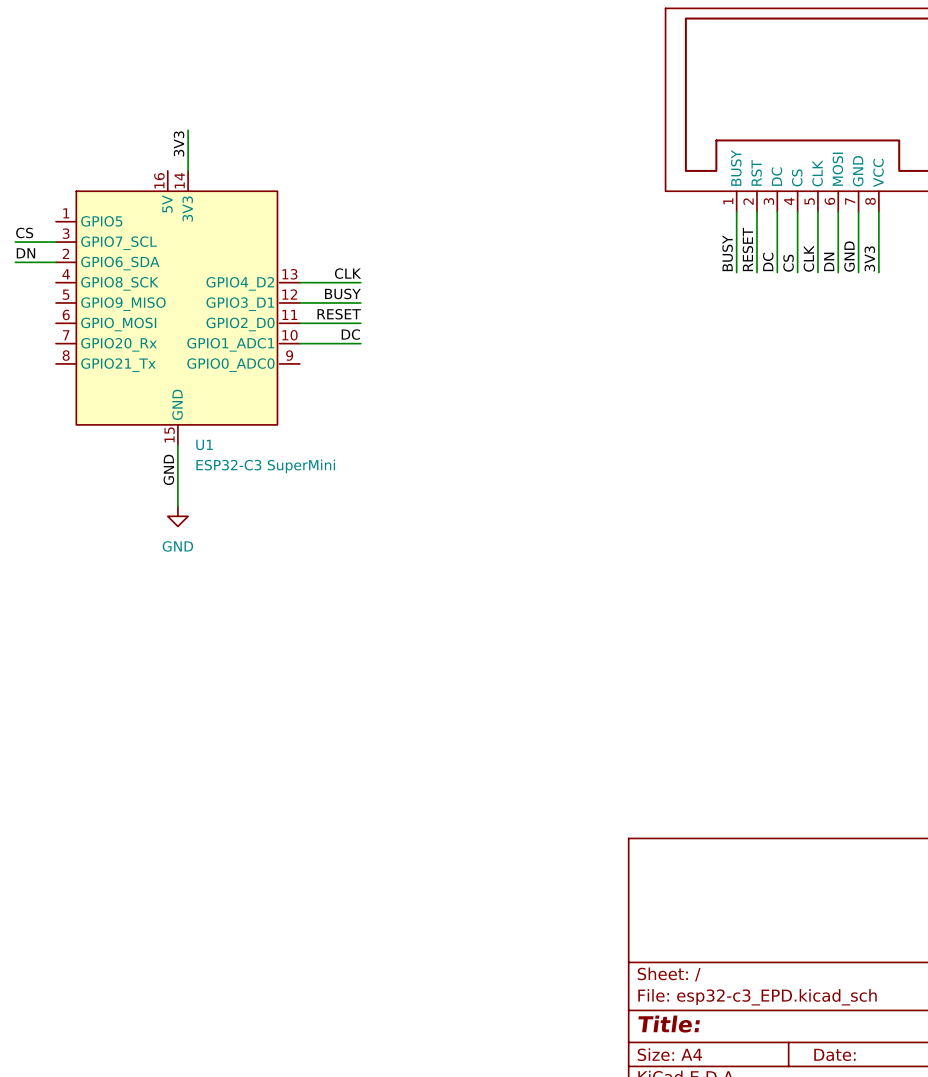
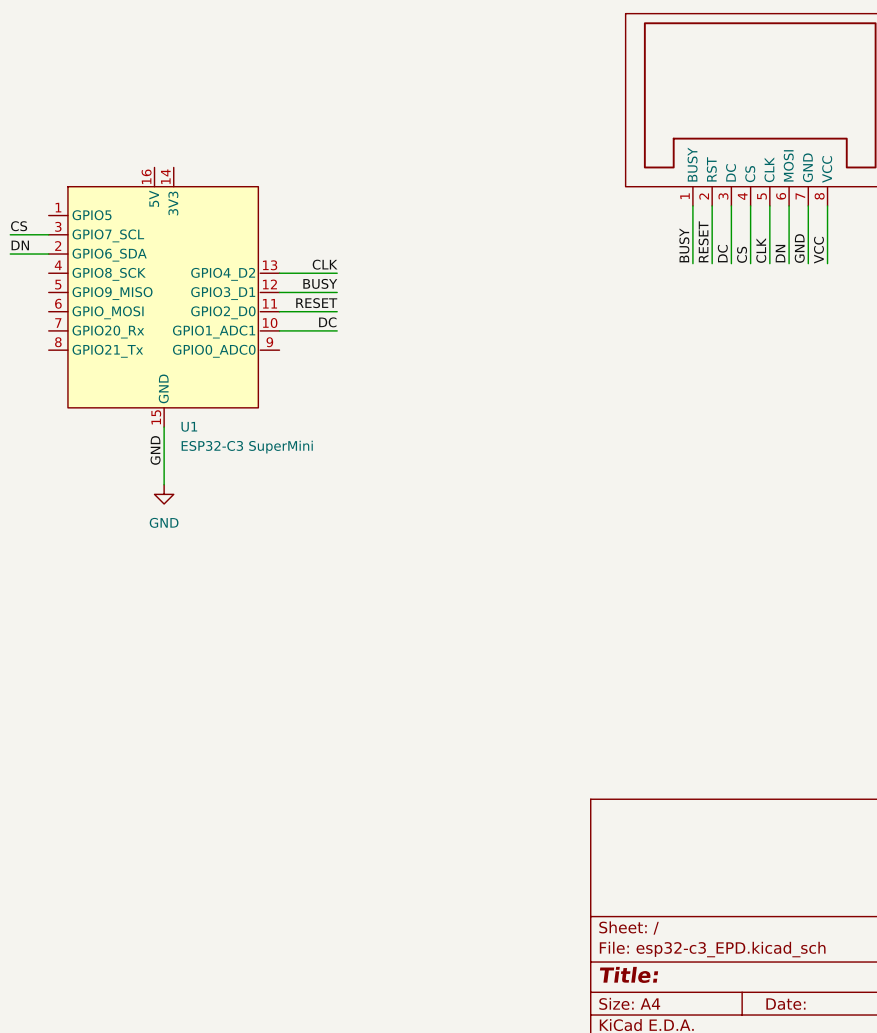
wire: (188, 130) (188, 170) -> none
label: 3V3 (179, 143) -> none
label: 3V3 (869, 258) -> VCC (818, 250)

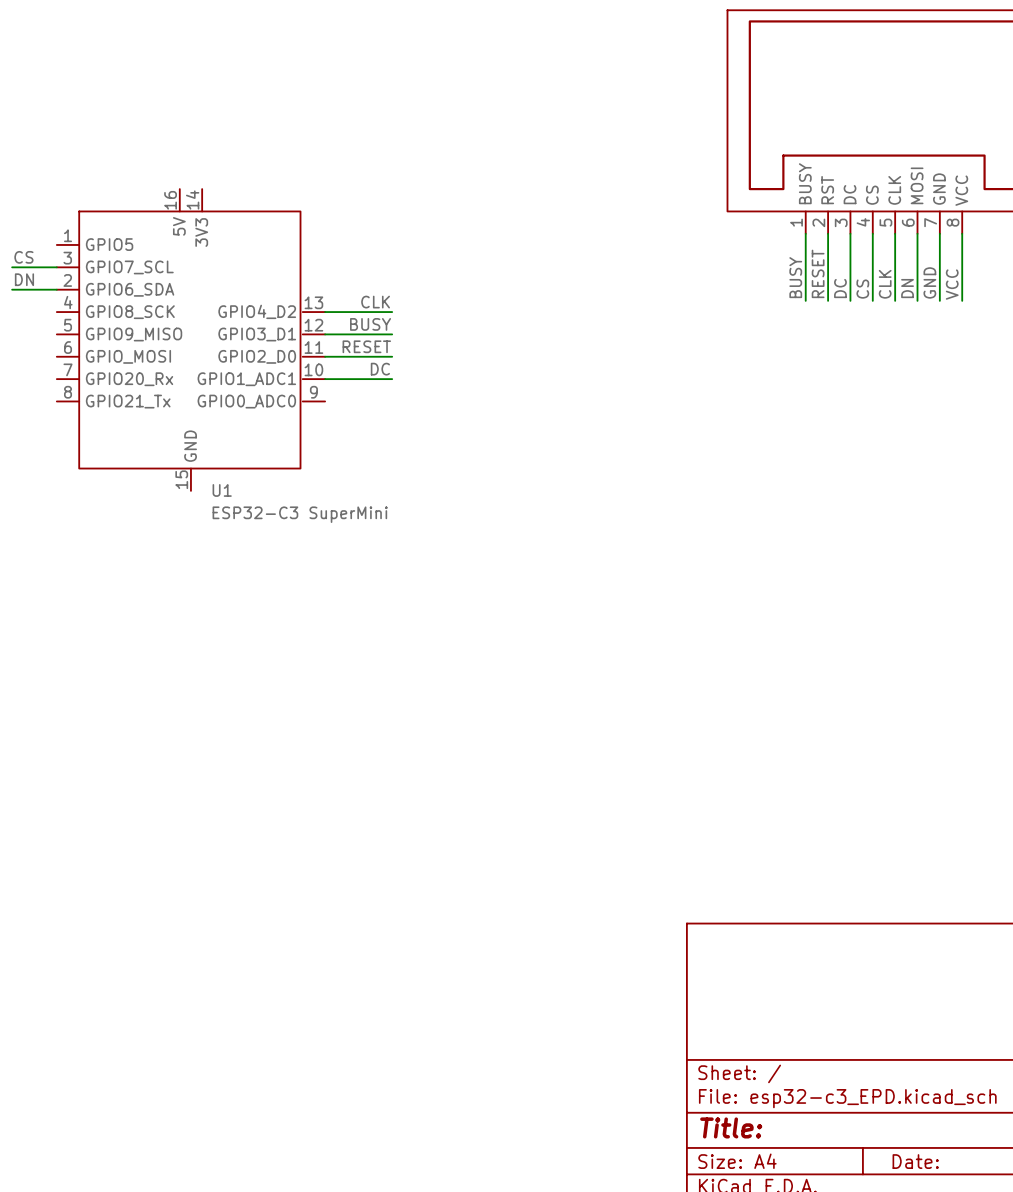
wire: (164, 427) (164, 484) -> none
label: GND (155, 450) -> none
power symbol: GND (164, 494) -> none

